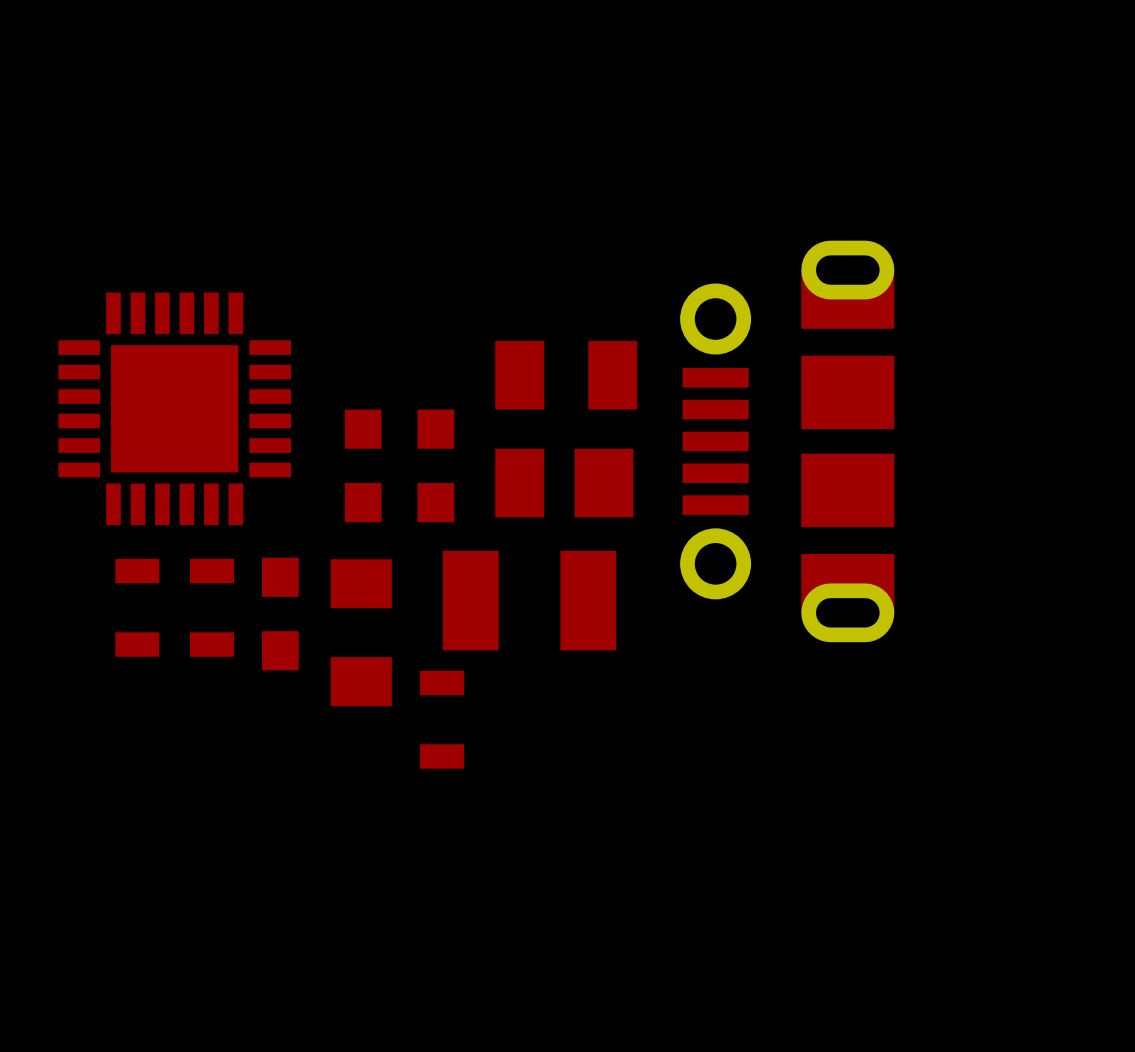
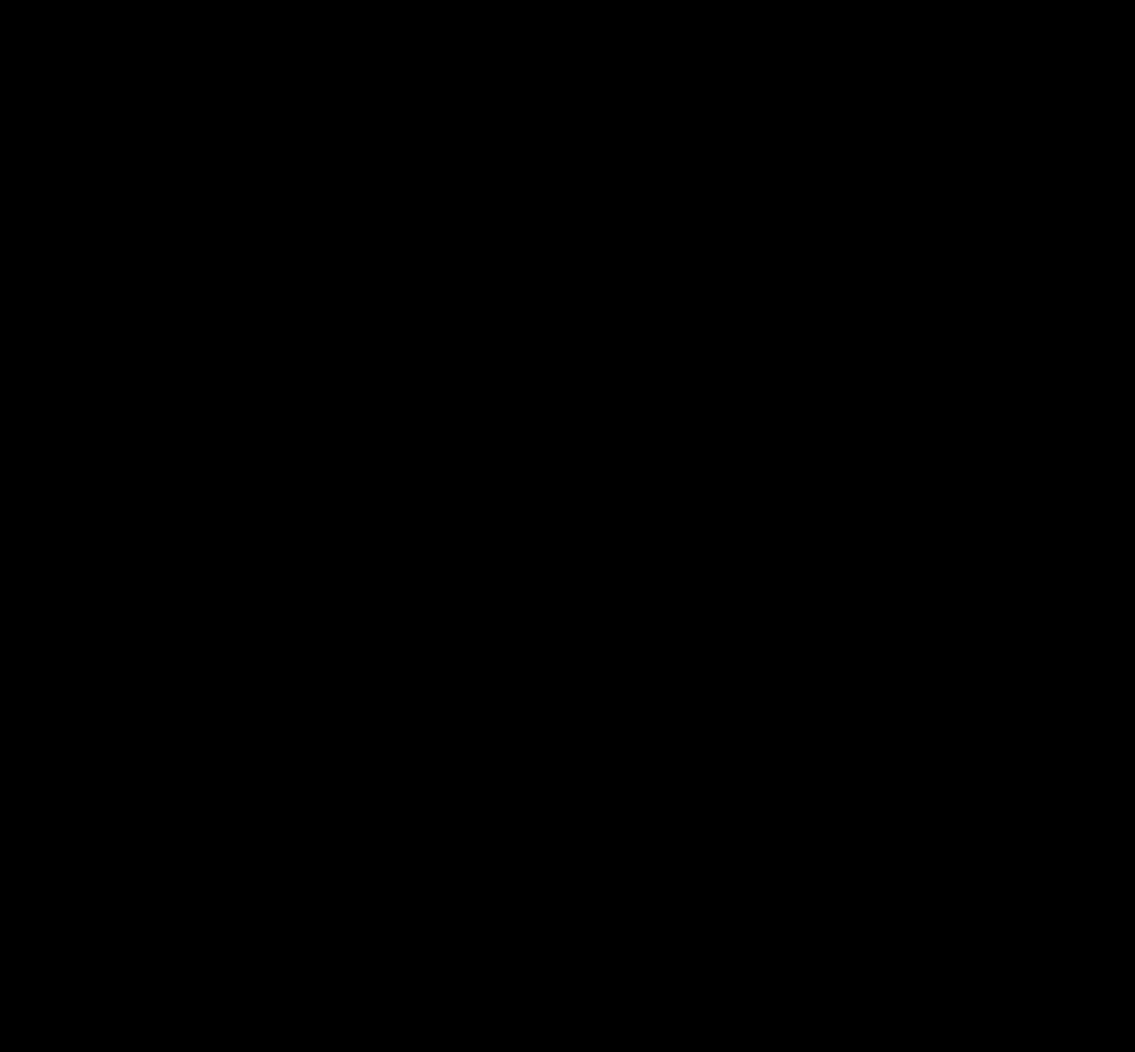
part: (174, 408) -> none
part: (566, 429) -> none
part: (787, 441) -> none
part: (363, 465) -> none
part: (435, 465) -> none
part: (529, 600) -> none
part: (137, 607) -> none
part: (211, 607) -> none
part: (280, 614) -> none
part: (361, 632) -> none
part: (442, 719) -> none

